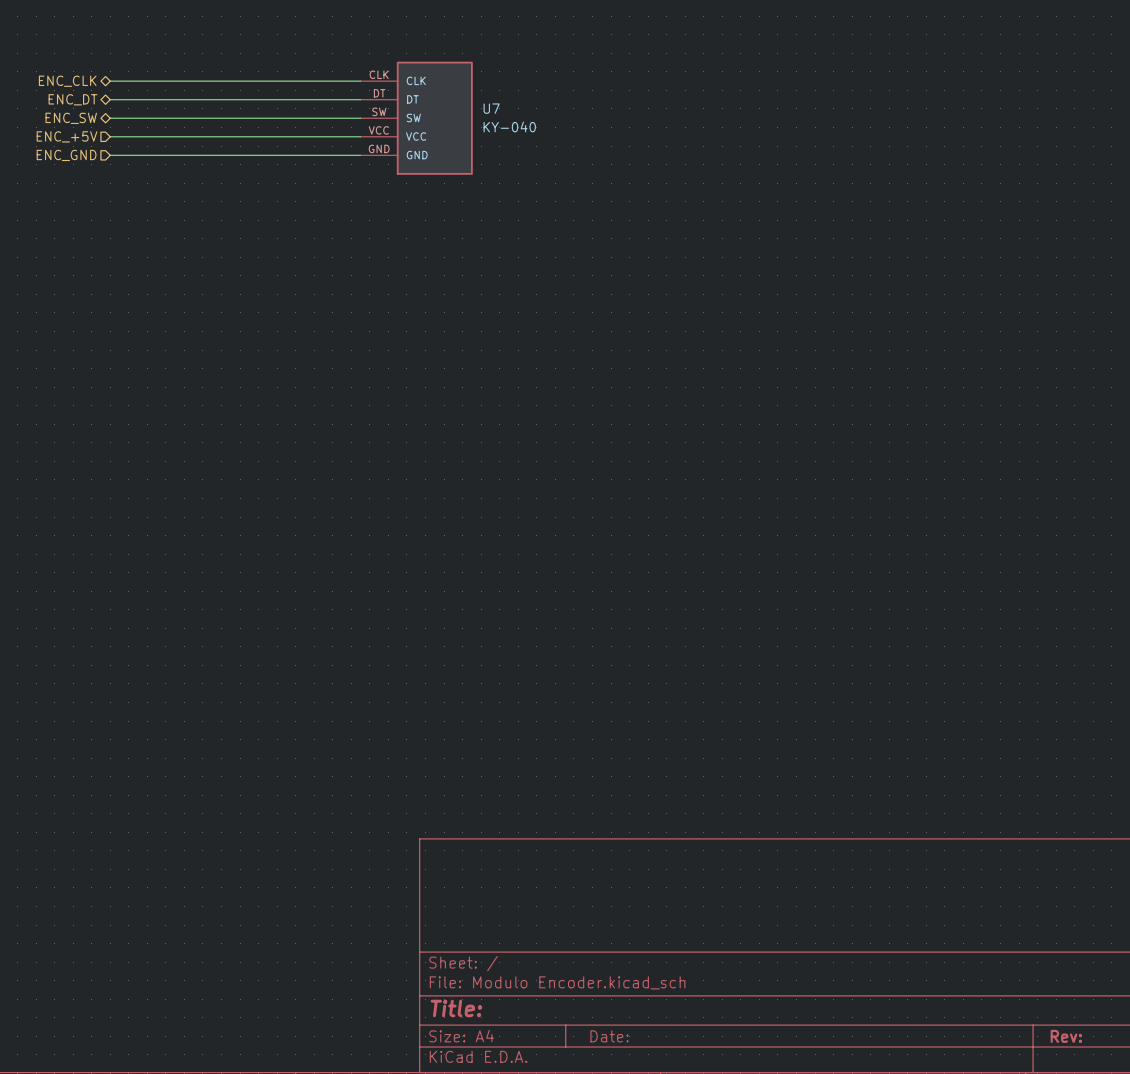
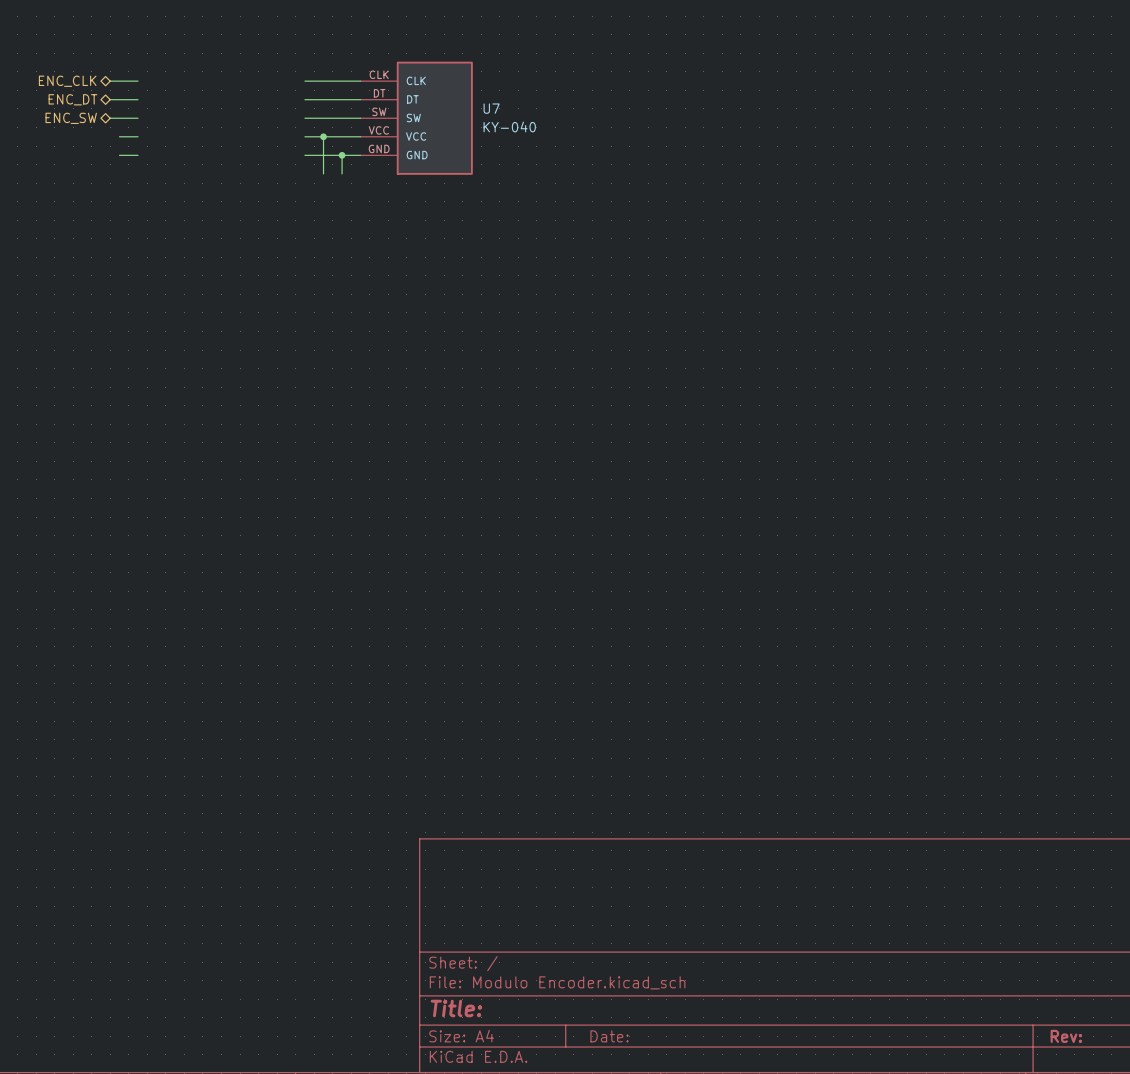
wire: (138, 81) (304, 81) -> none
wire: (138, 99) (304, 99) -> none
wire: (138, 118) (304, 118) -> none
hierarchical label: ENC_+5V (67, 136) -> none
wire: (110, 136) (119, 136) -> none
wire: (138, 136) (304, 136) -> none
wire: none -> (323, 136) (323, 173)
junction: none -> (323, 136)
hierarchical label: ENC_GND (66, 155) -> none
wire: (110, 155) (119, 155) -> none
wire: (138, 155) (304, 155) -> none
wire: none -> (342, 155) (342, 173)
junction: none -> (342, 155)

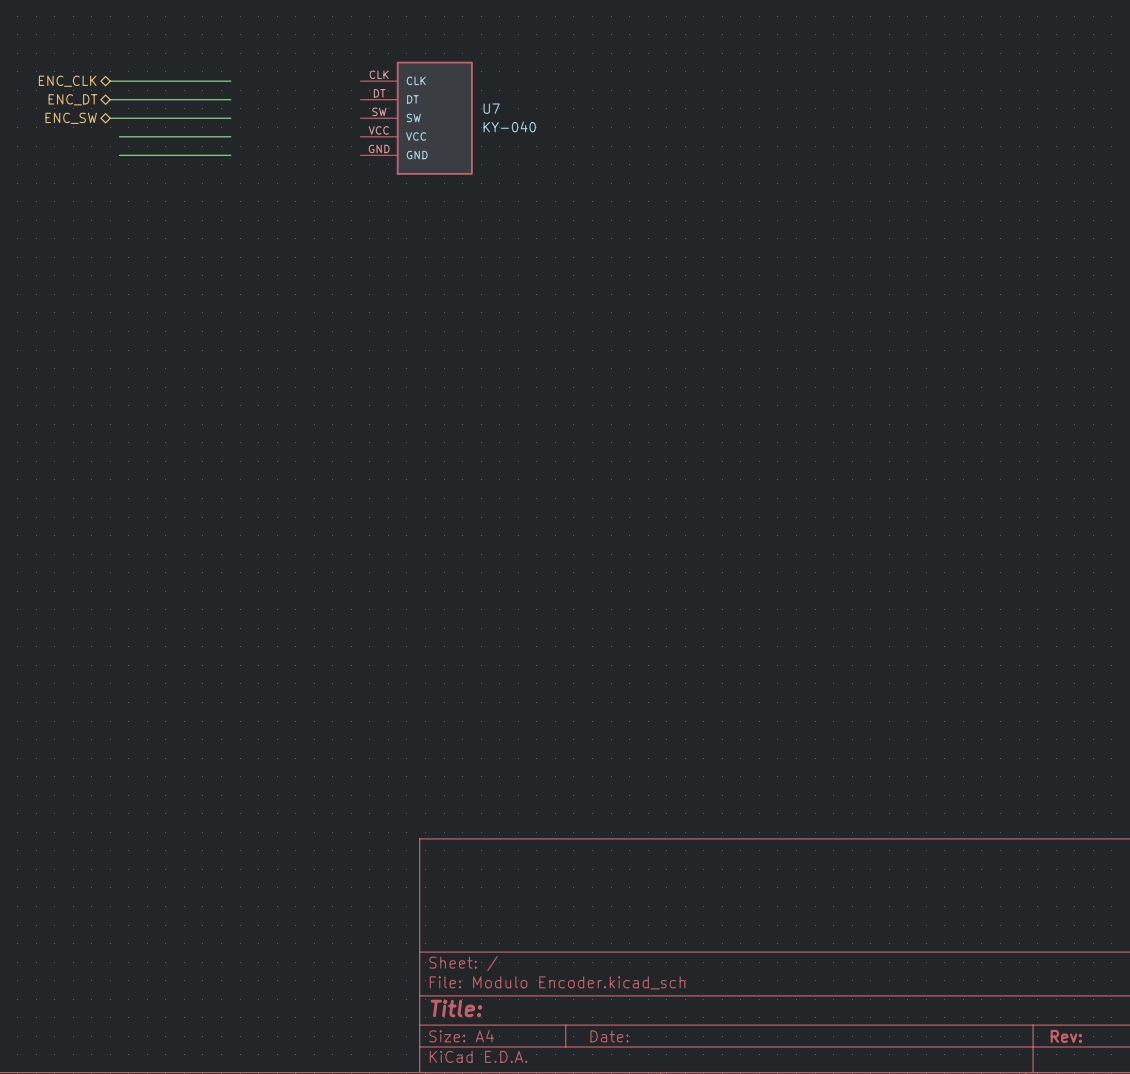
wire: none -> (138, 81) (230, 81)
wire: (304, 81) (360, 81) -> none
wire: none -> (138, 99) (230, 99)
wire: (304, 99) (360, 99) -> none
wire: none -> (138, 118) (230, 118)
wire: (304, 118) (360, 118) -> none
wire: none -> (138, 136) (230, 136)
wire: (304, 136) (360, 136) -> none
wire: (323, 136) (323, 173) -> none
junction: (323, 136) -> none
wire: none -> (138, 155) (230, 155)
wire: (304, 155) (360, 155) -> none
wire: (342, 155) (342, 173) -> none
junction: (342, 155) -> none

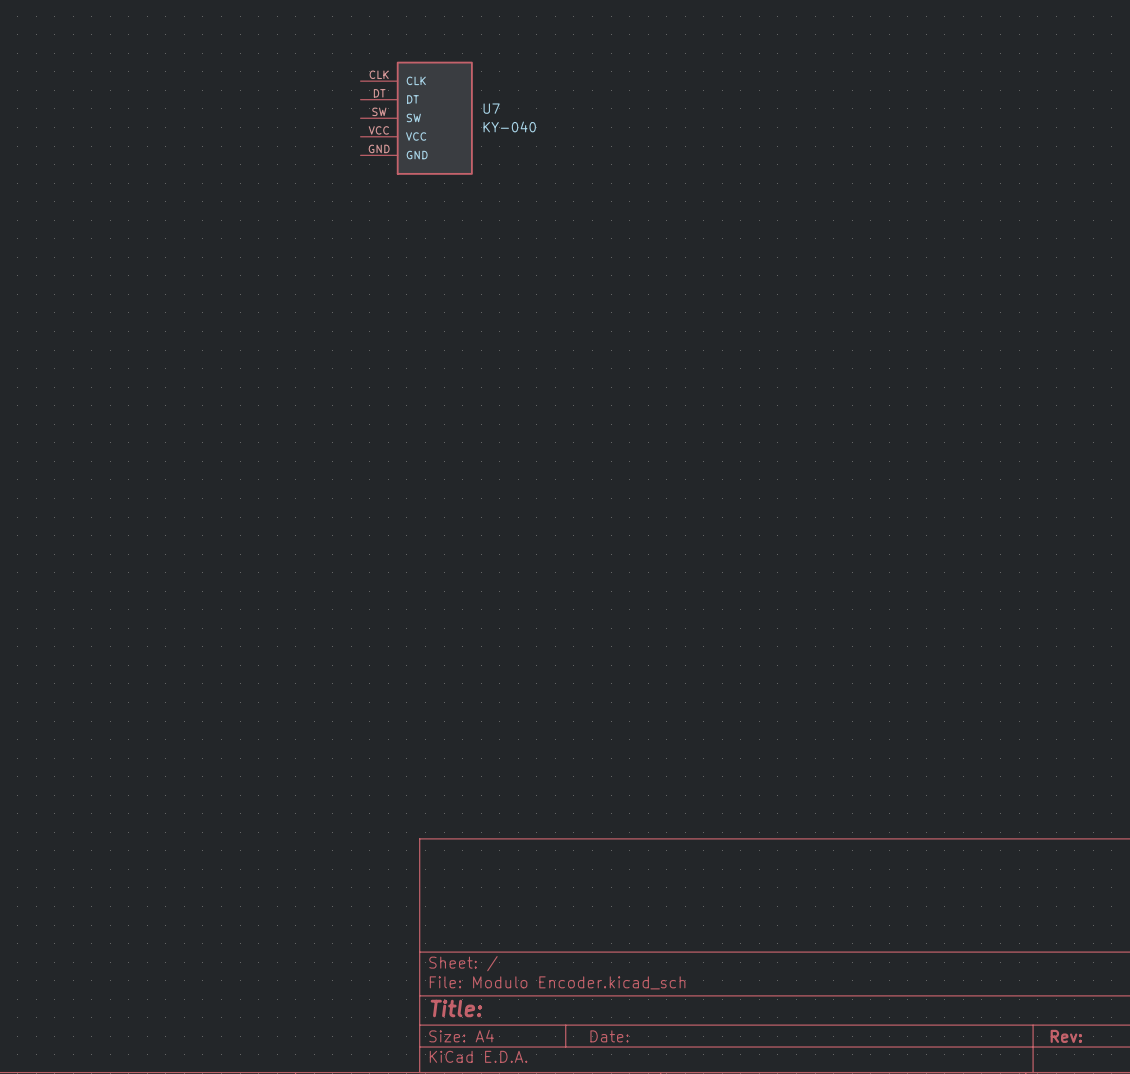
hierarchical label: ENC_CLK (67, 81) -> none
wire: (110, 81) (230, 81) -> none
hierarchical label: ENC_DT (72, 99) -> none
wire: (110, 99) (230, 99) -> none
hierarchical label: ENC_SW (71, 118) -> none
wire: (110, 118) (230, 118) -> none
wire: (119, 136) (230, 136) -> none
wire: (119, 155) (230, 155) -> none

